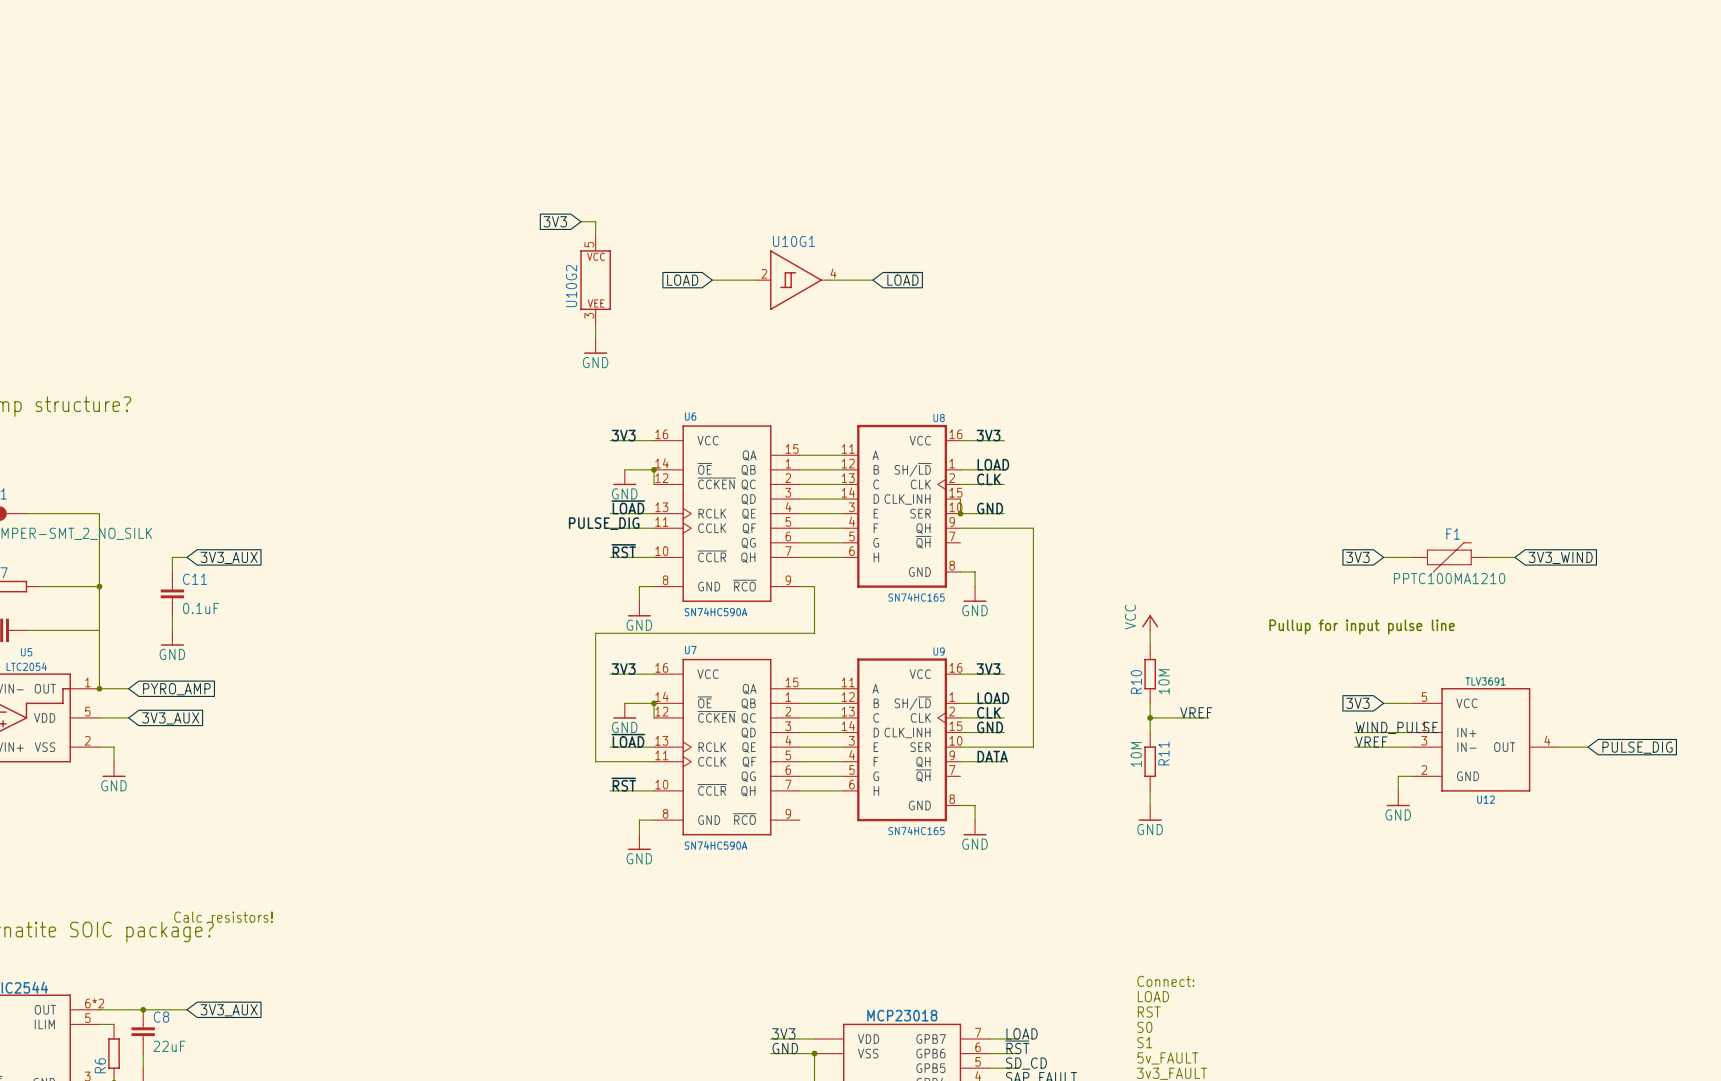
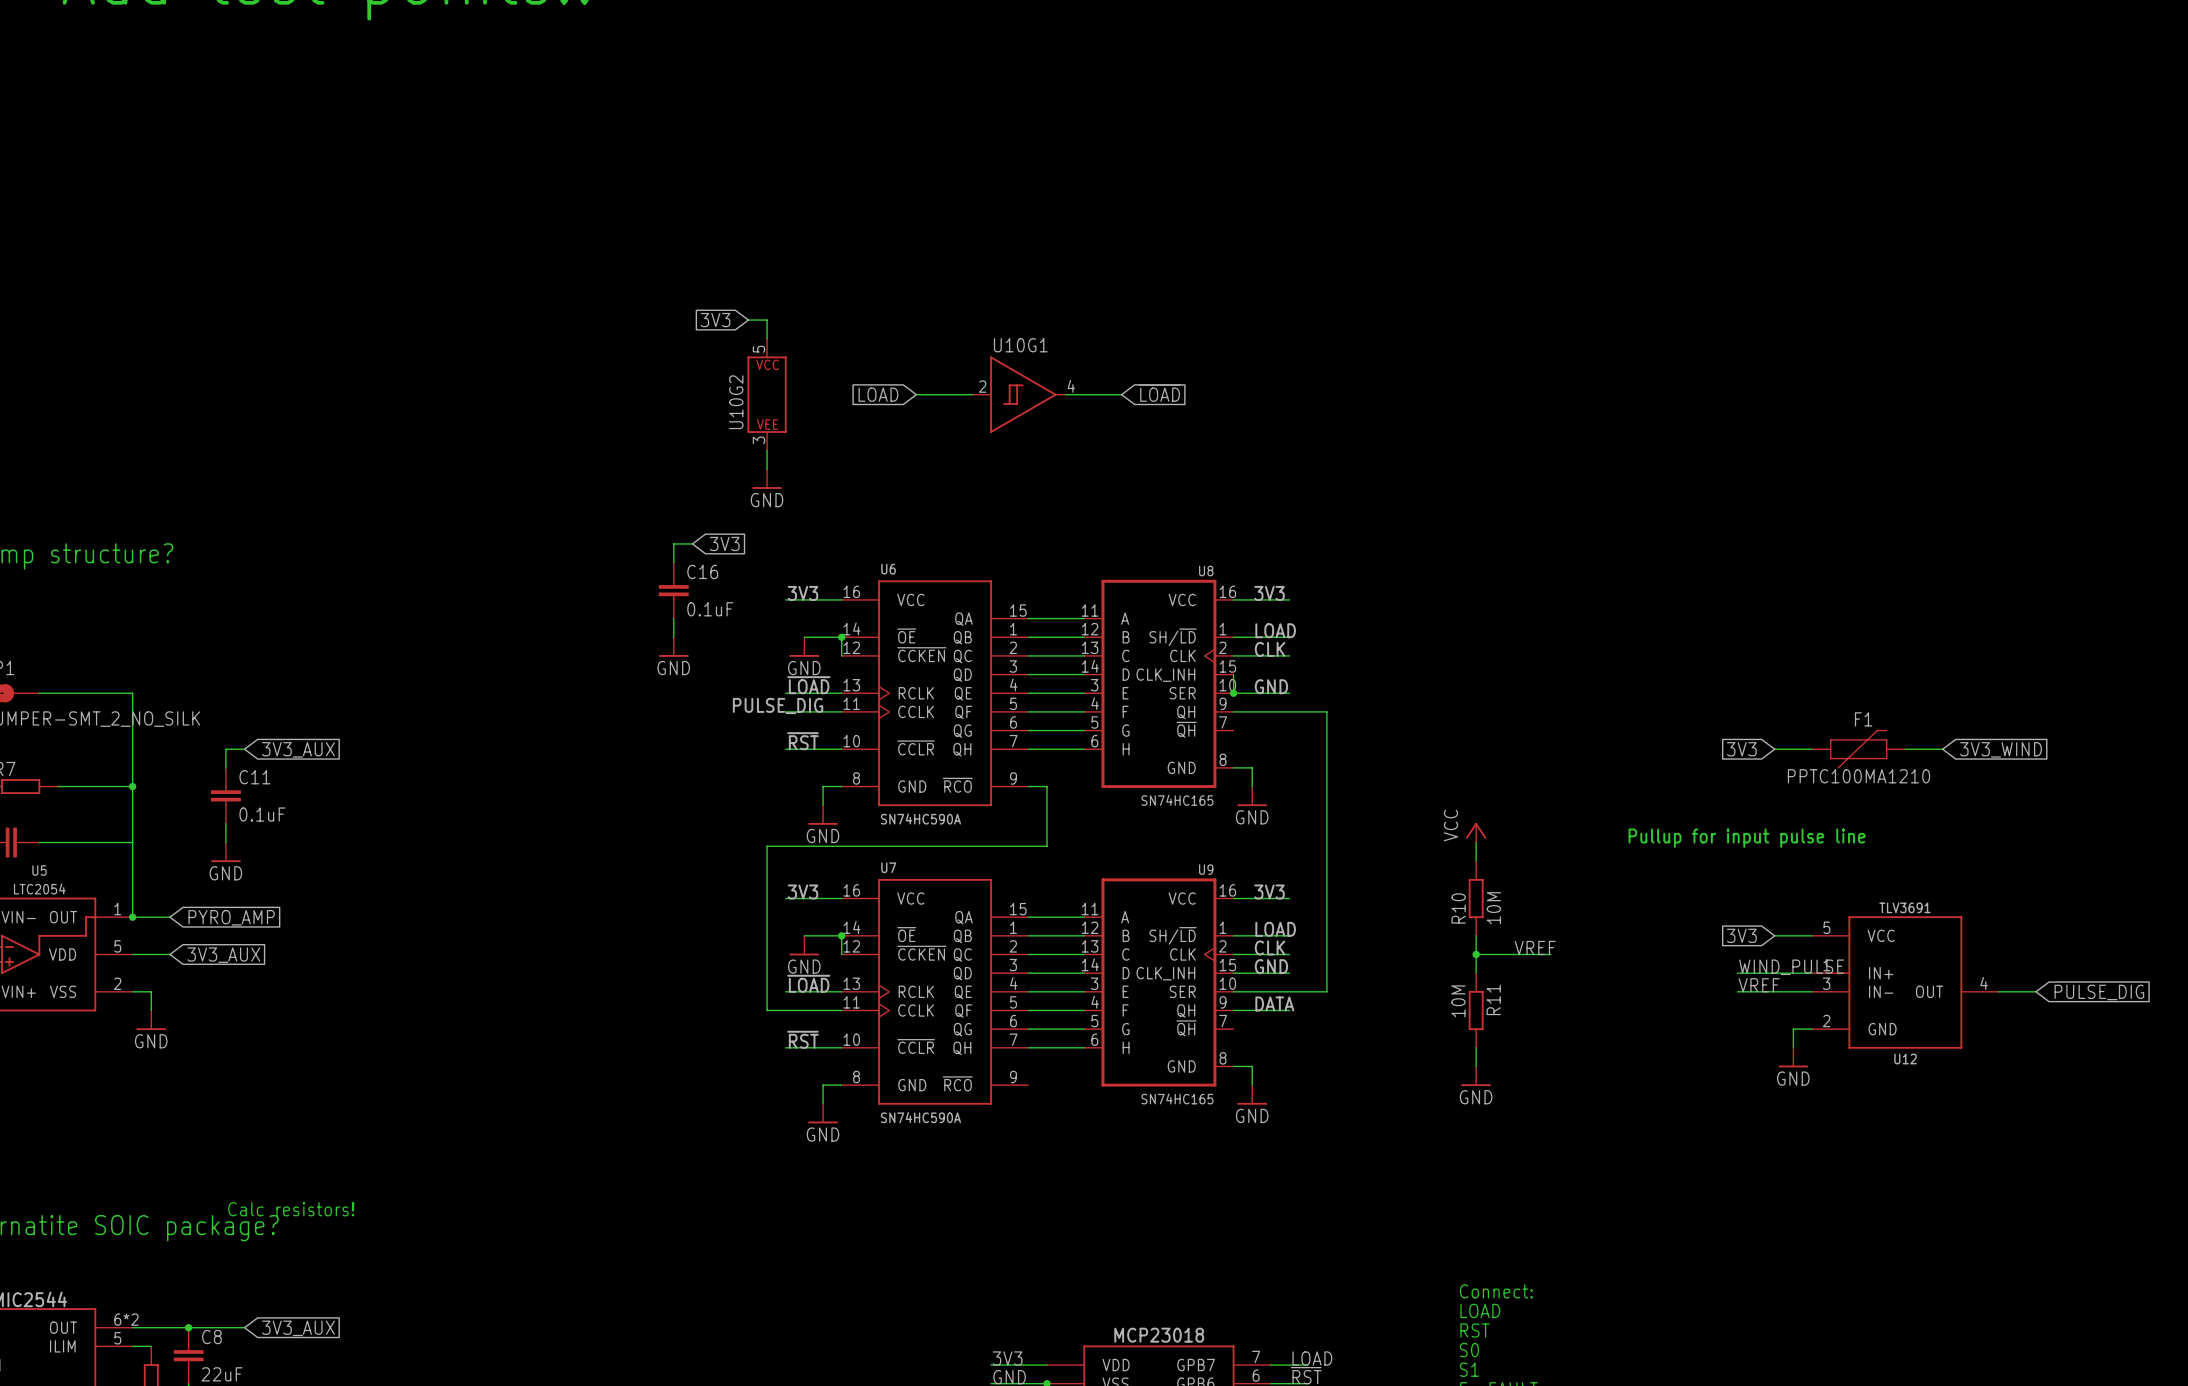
wire: none -> (692, 543) (673, 543) (673, 562)
global label: none -> 3V3 (724, 543)
C16: none -> 0.1uF (673, 590)
wire: none -> (673, 618) (673, 637)
power symbol: none -> GND (673, 647)

